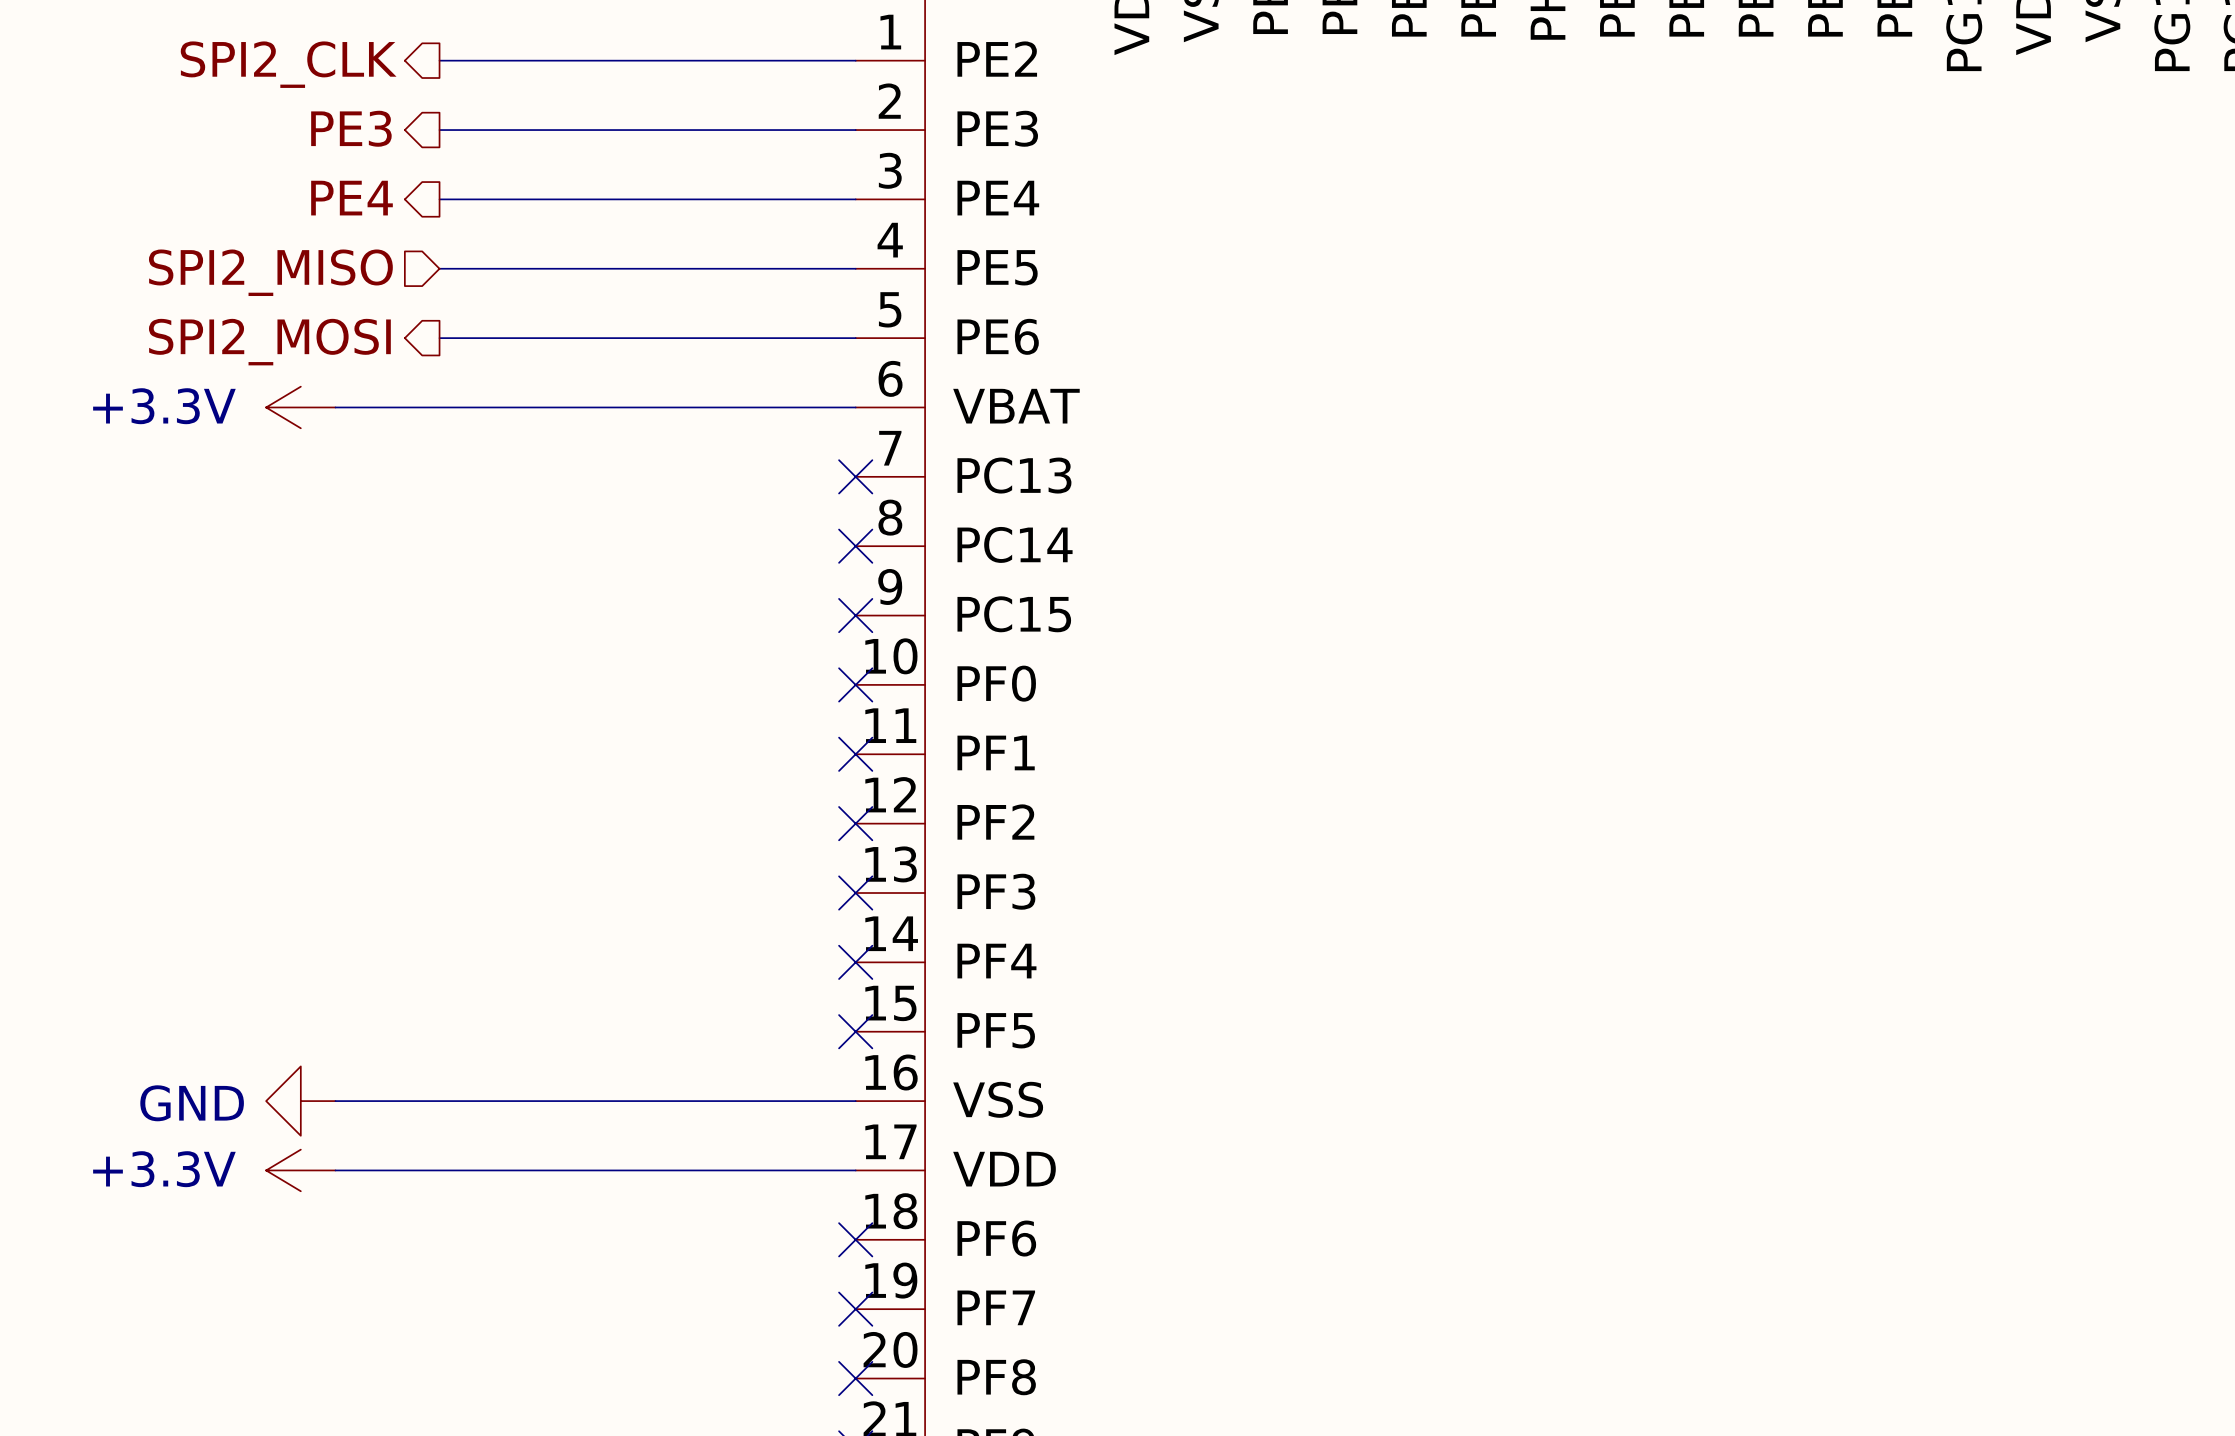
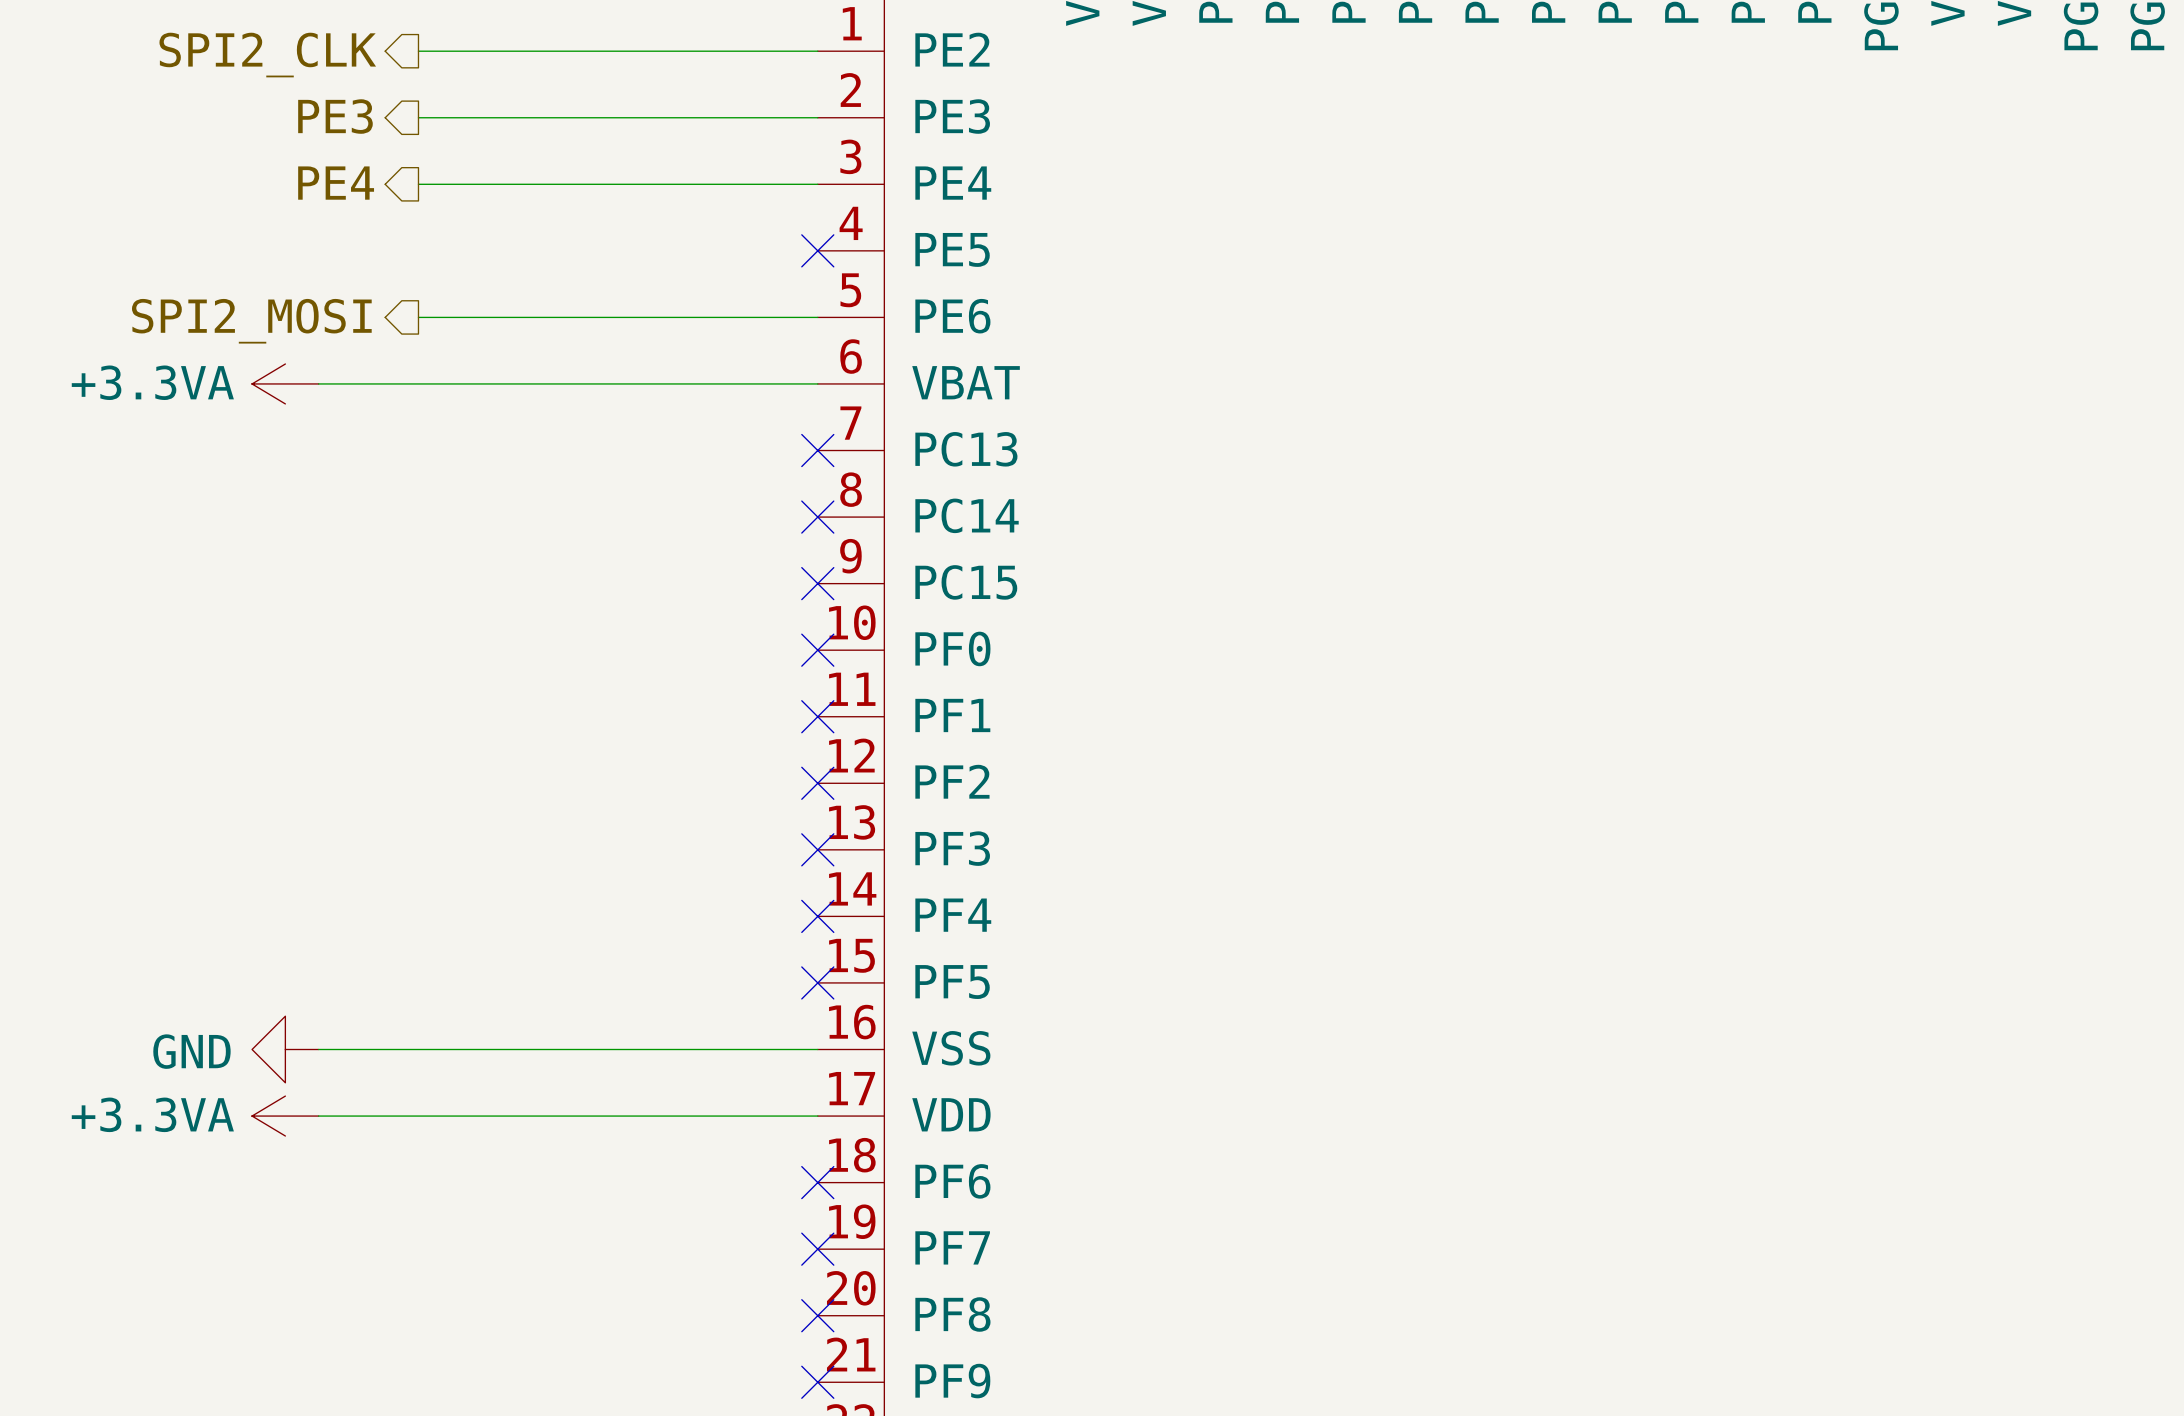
wire: (439, 268) (855, 268) -> none
no-connect mark: none -> (817, 250)
hierarchical label: SPI2_MISO (270, 272) -> none
power symbol: +3.3V (300, 407) -> +3.3VA (285, 383)
power symbol: +3.3V (300, 1170) -> +3.3VA (285, 1116)

